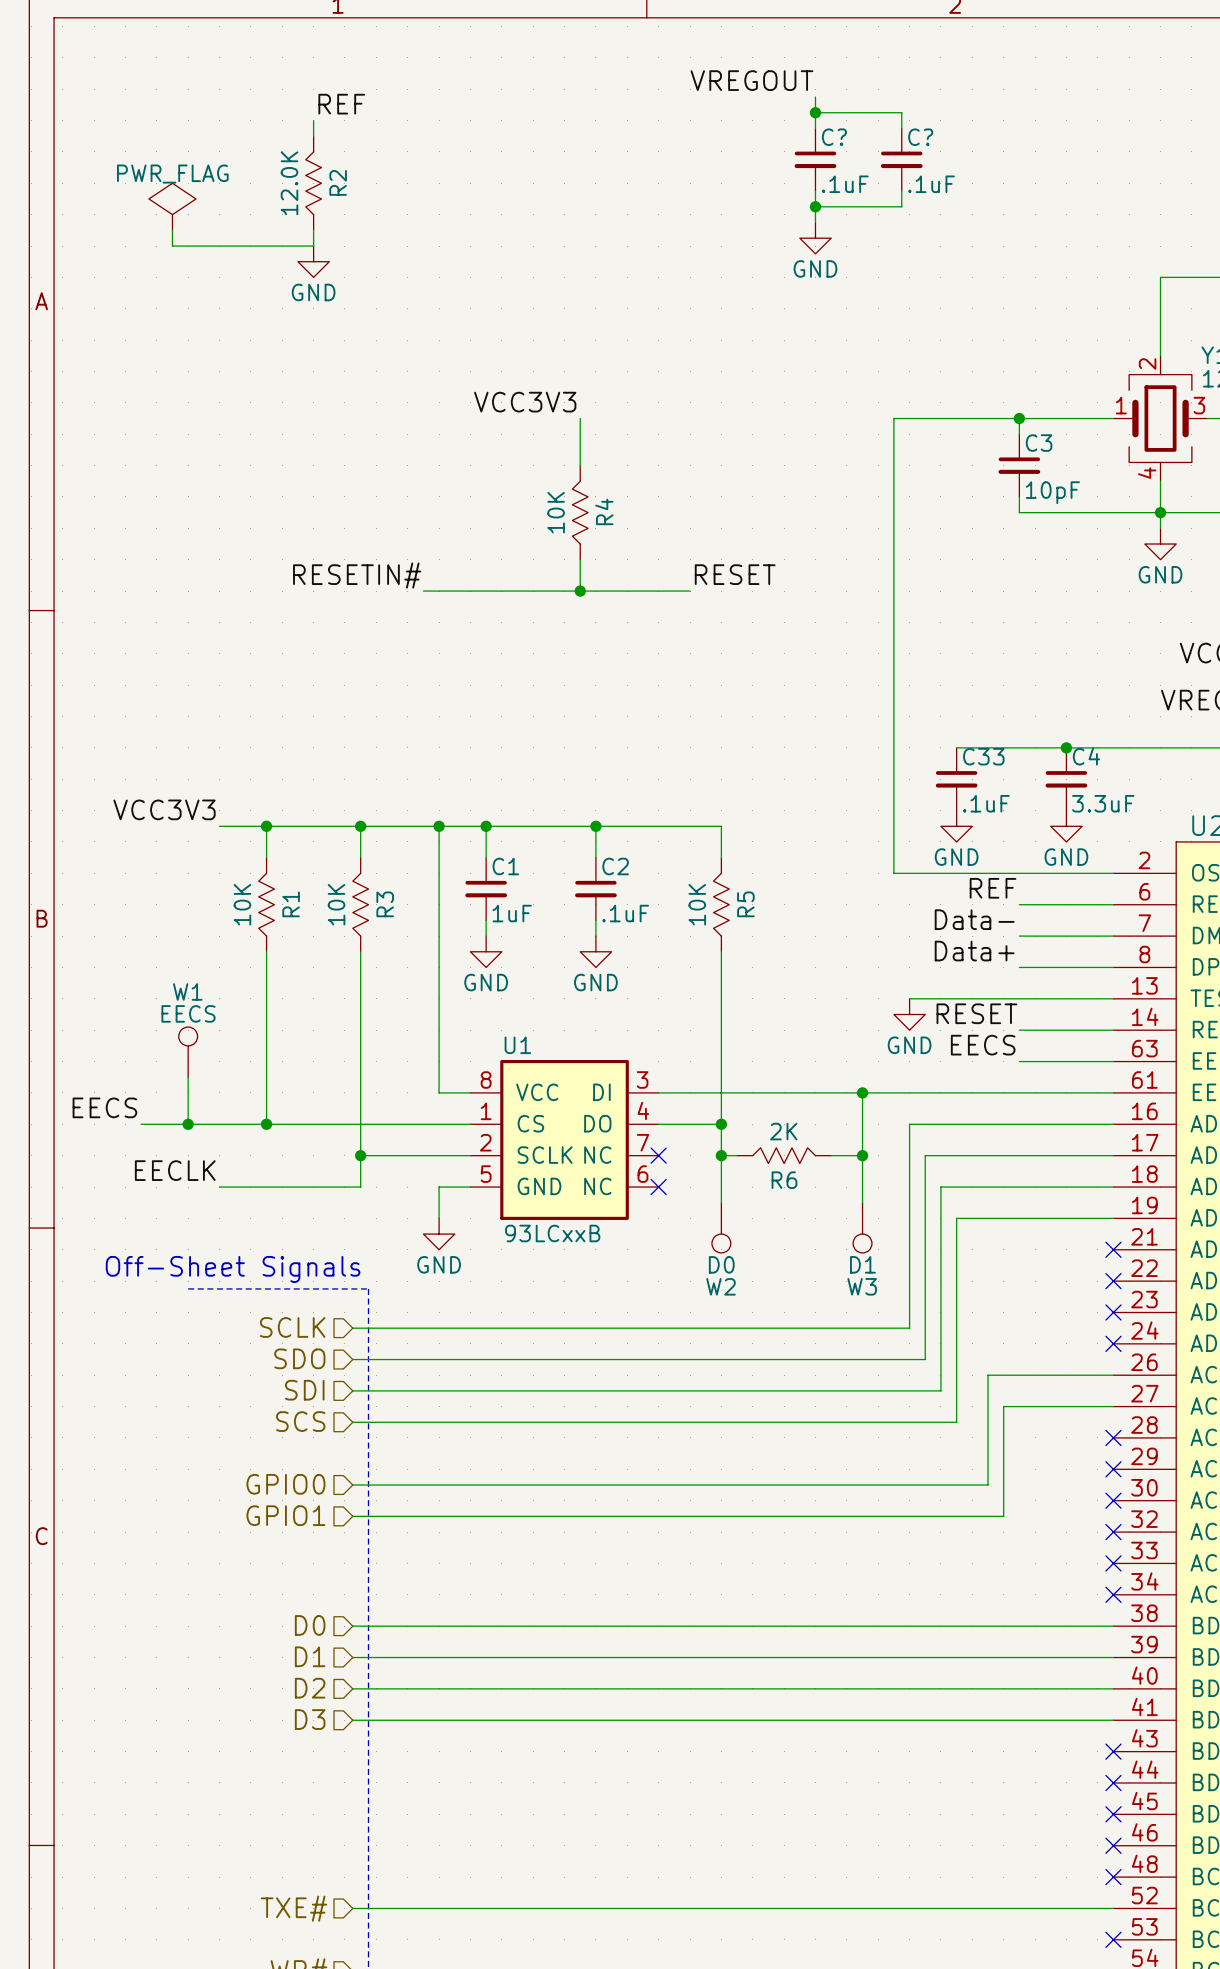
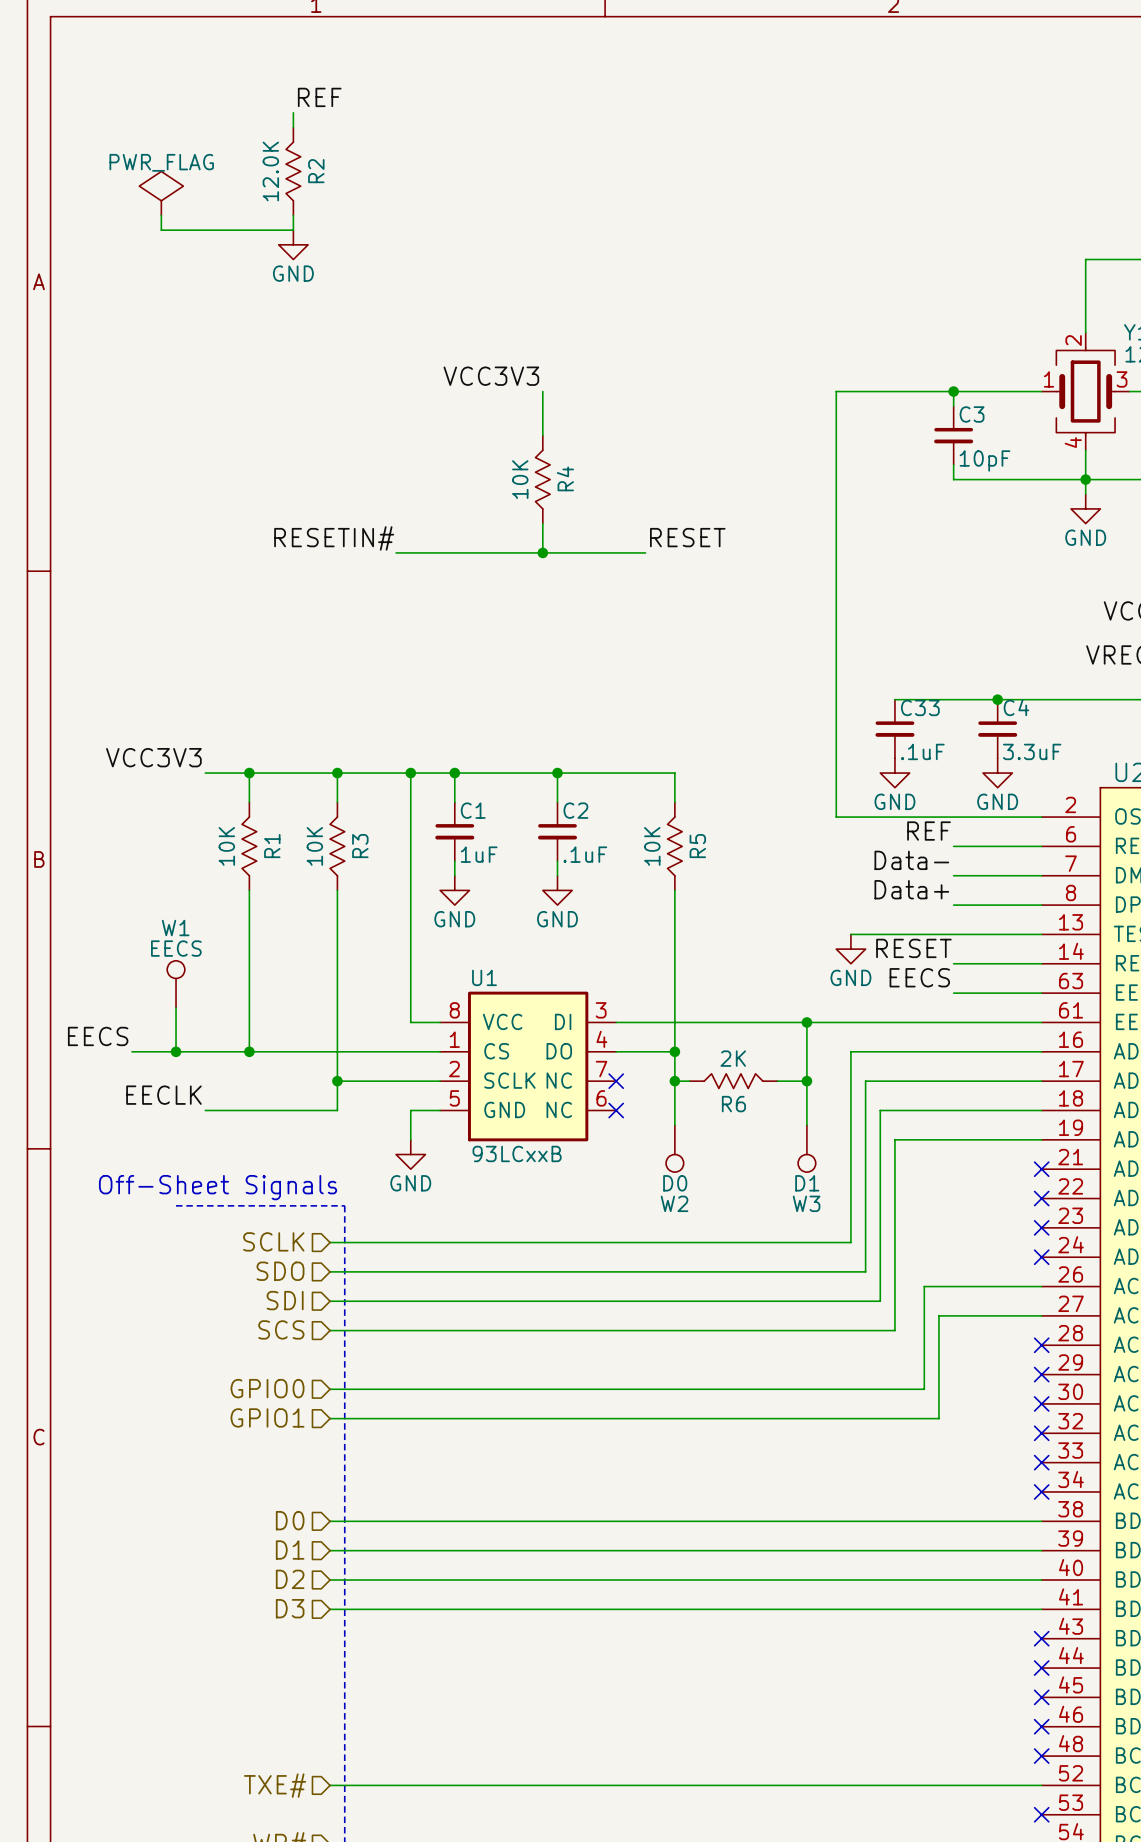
label: VREGOUT (751, 80) -> none
wire: (815, 97) (815, 128) -> none
wire: (815, 112) (901, 112) (901, 128) -> none
junction: (815, 112) -> none
C?: .1uF (815, 159) -> none
C?: .1uF (901, 159) -> none
wire: (815, 191) (815, 222) -> none
wire: (901, 191) (901, 206) (815, 206) -> none
junction: (815, 206) -> none
power symbol: GND (815, 238) -> none

